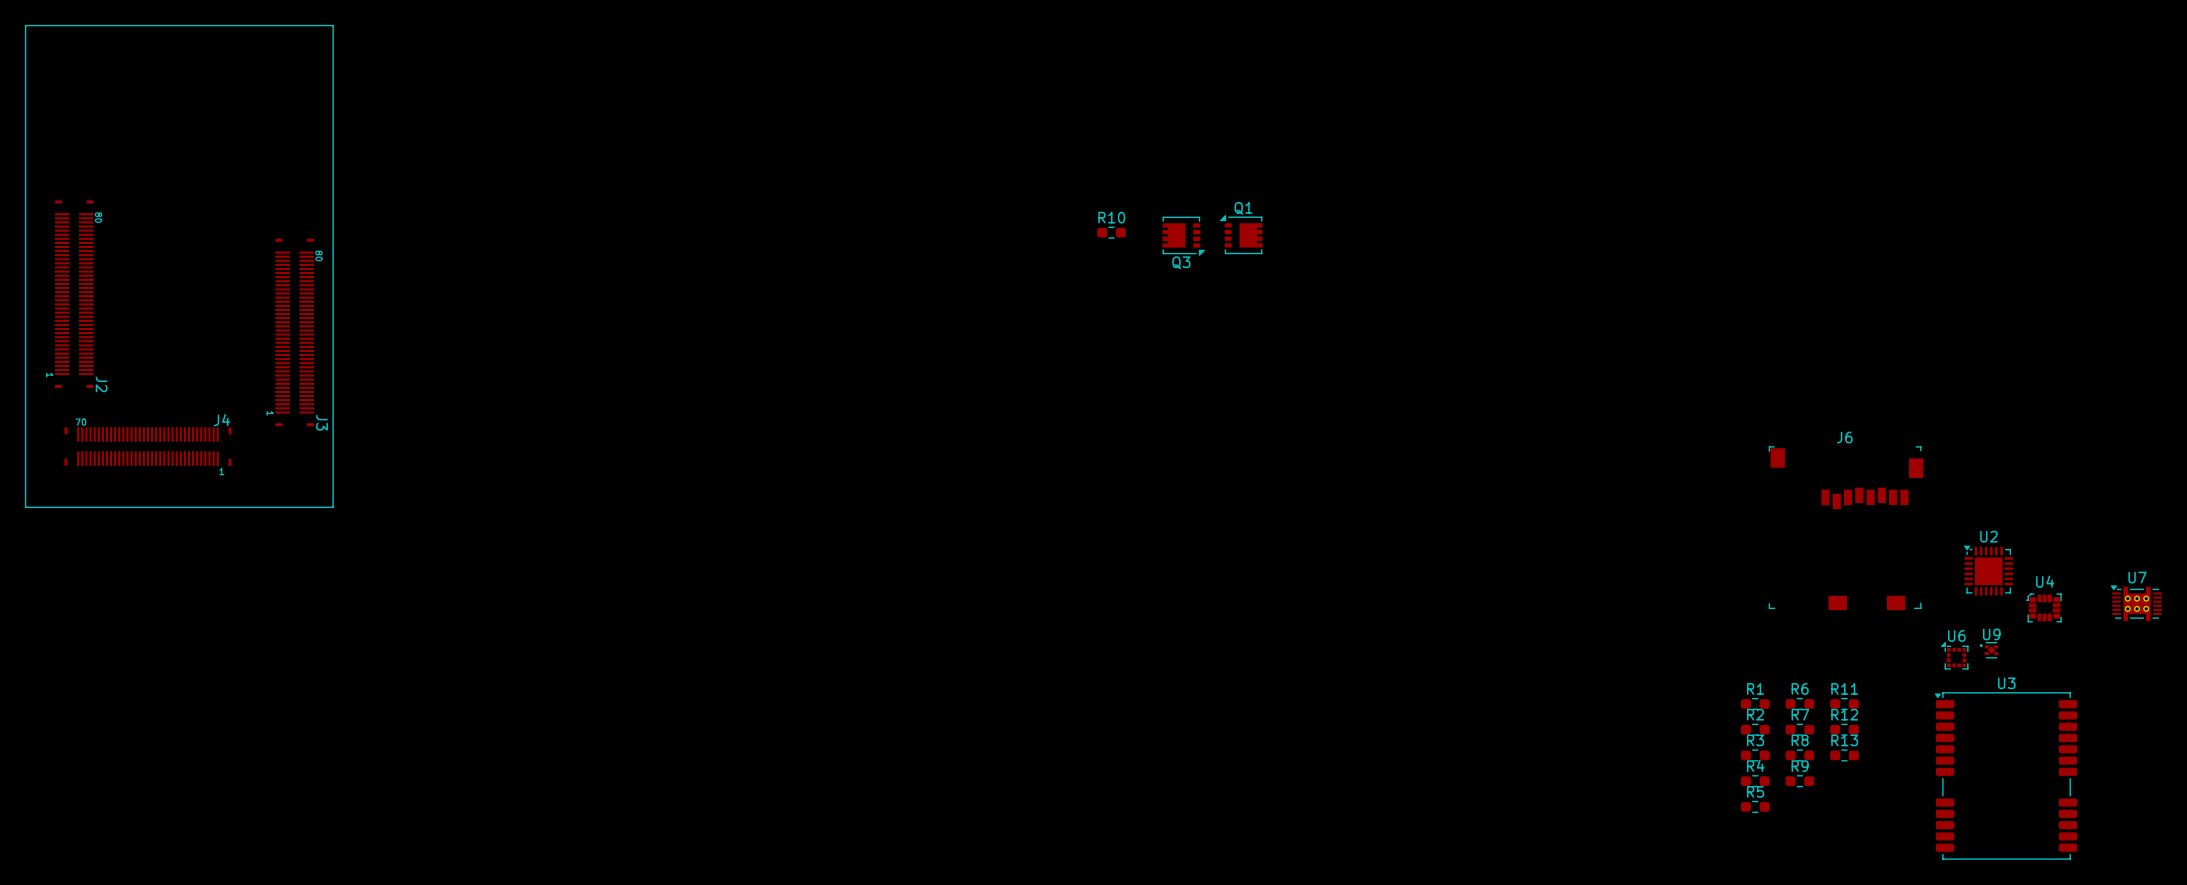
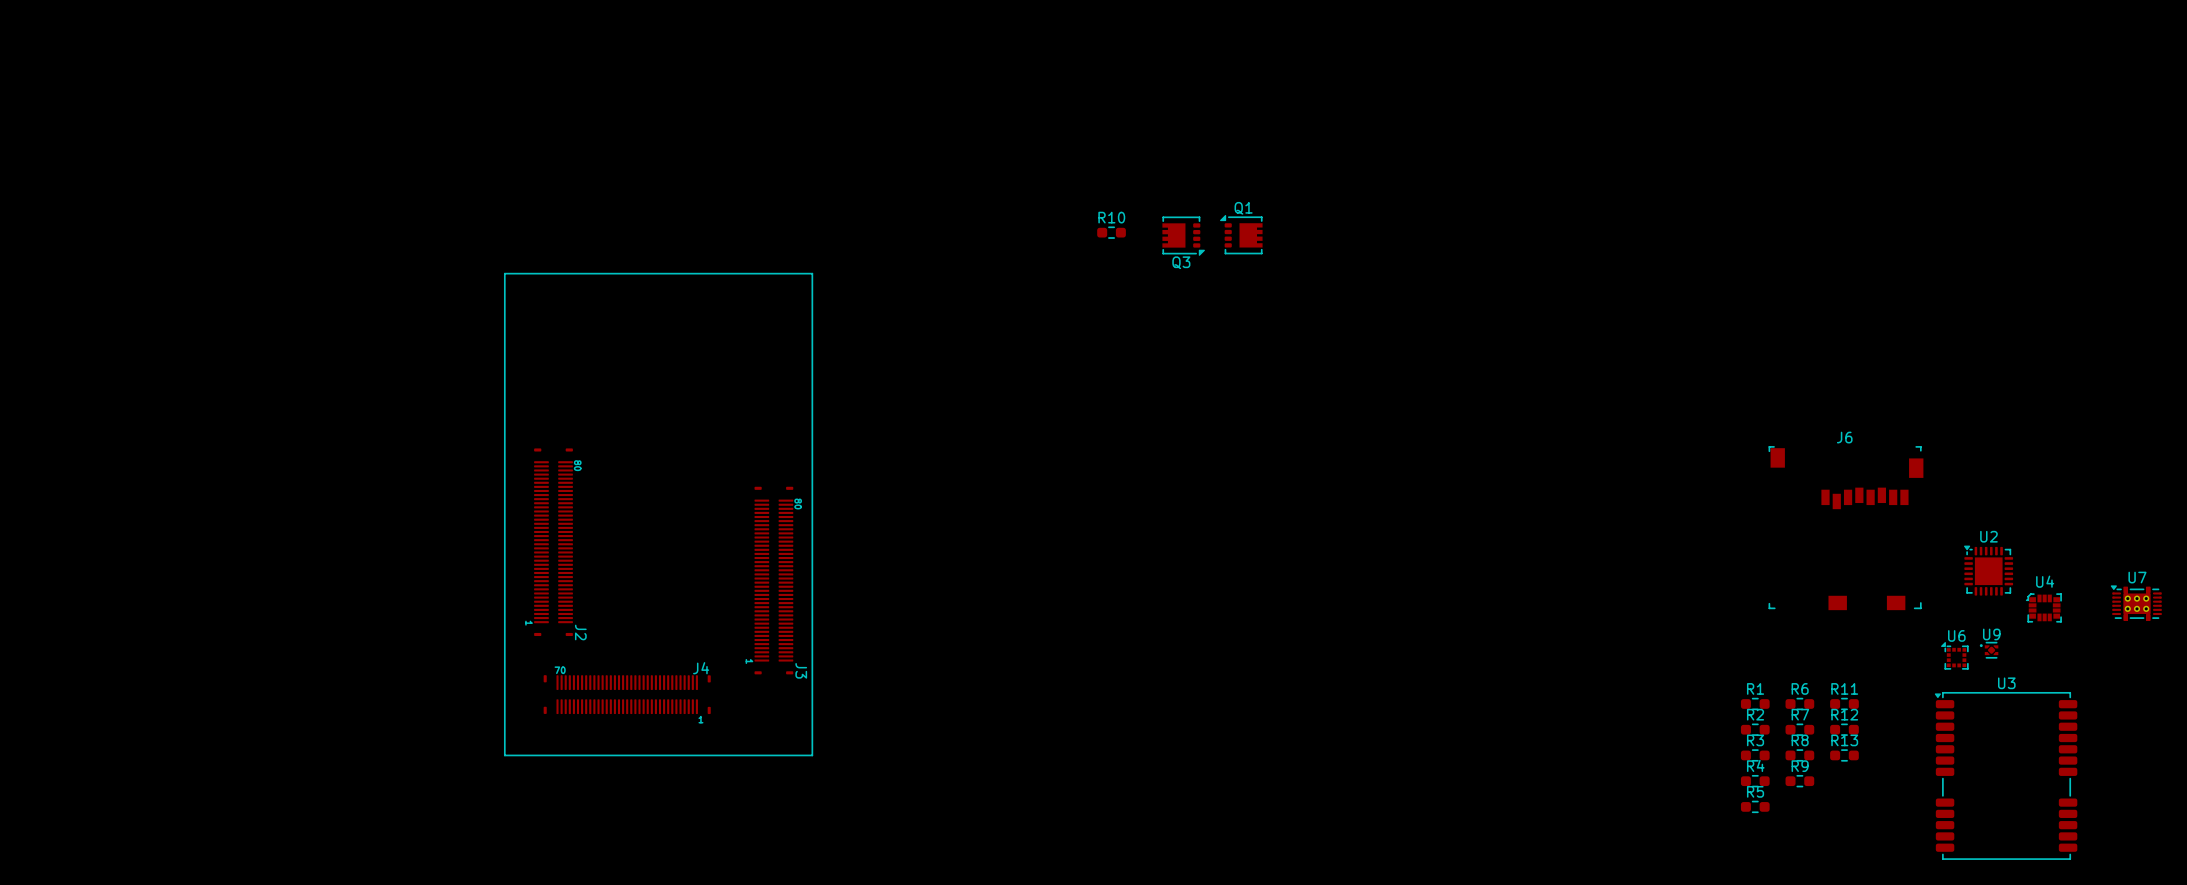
line: (25, 25) (333, 25) (333, 507) (25, 507) (25, 25) -> none
line: none -> (504, 273) (812, 273) (812, 755) (504, 755) (504, 273)
J2 position: (74, 294) -> (553, 542)
J3 position: (294, 332) -> (773, 580)
J4 position: (147, 446) -> (627, 694)

